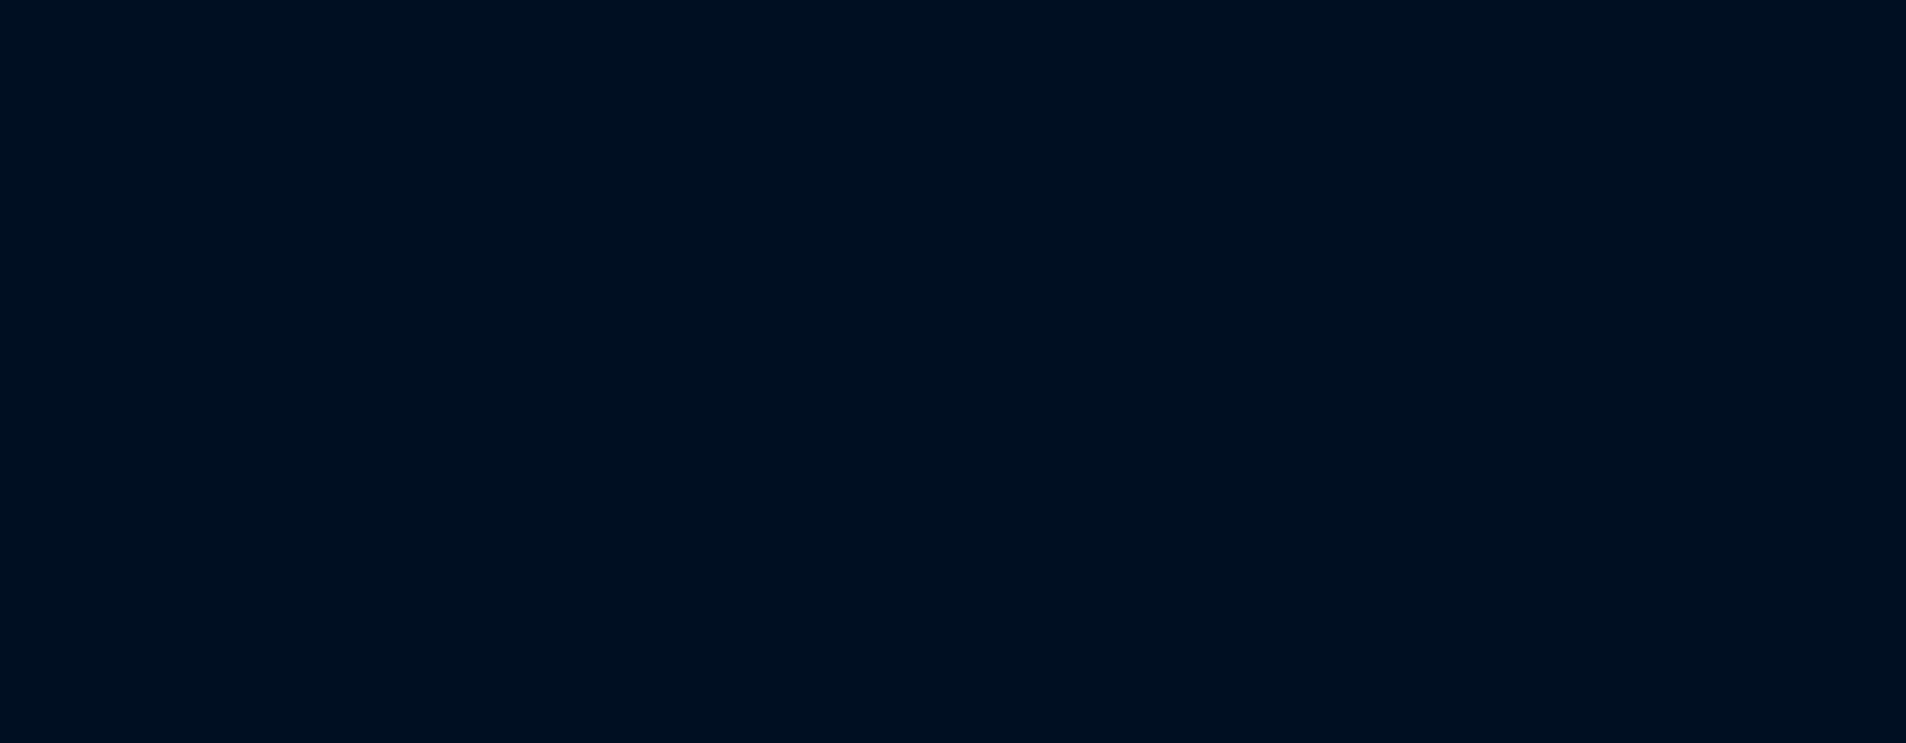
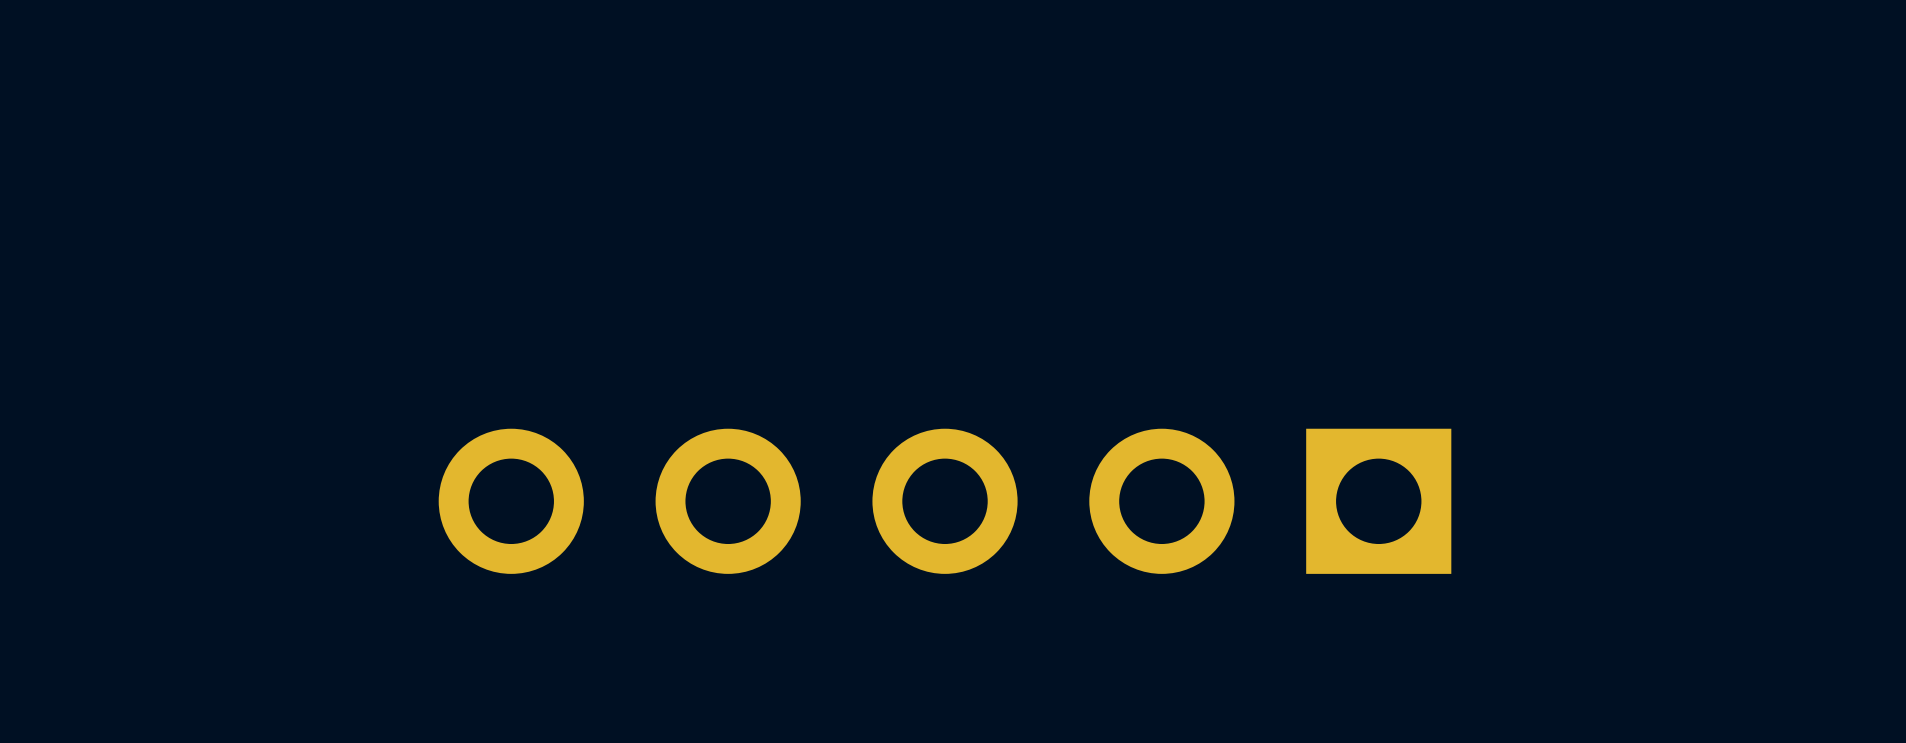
part: none -> (945, 501)

